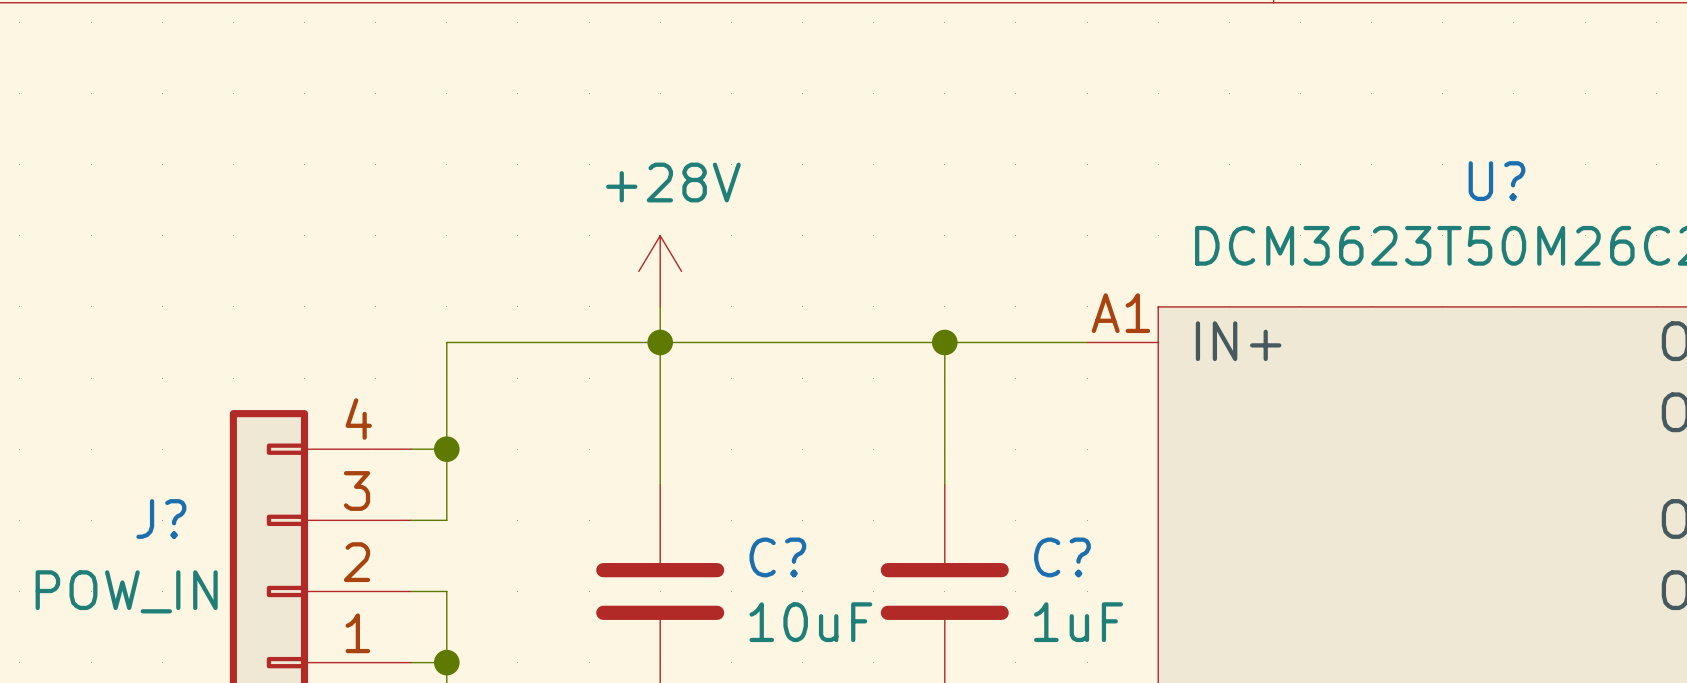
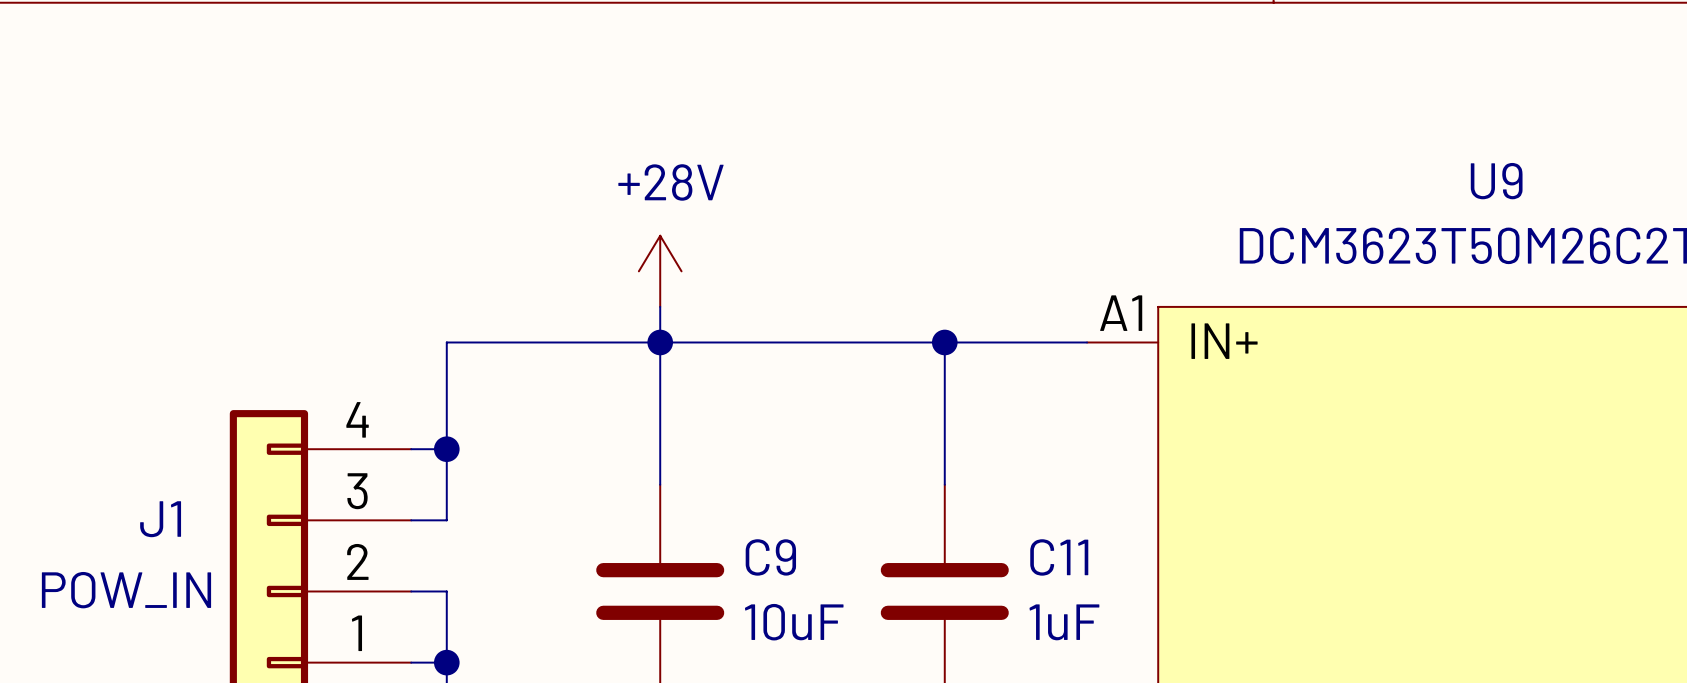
U? name: U? (1496, 181) -> U9 (1496, 181)
J? name: J? (161, 519) -> J1 (160, 519)
C? name: C? (777, 557) -> C9 (770, 557)
C? name: C? (1062, 557) -> C11 (1059, 557)

